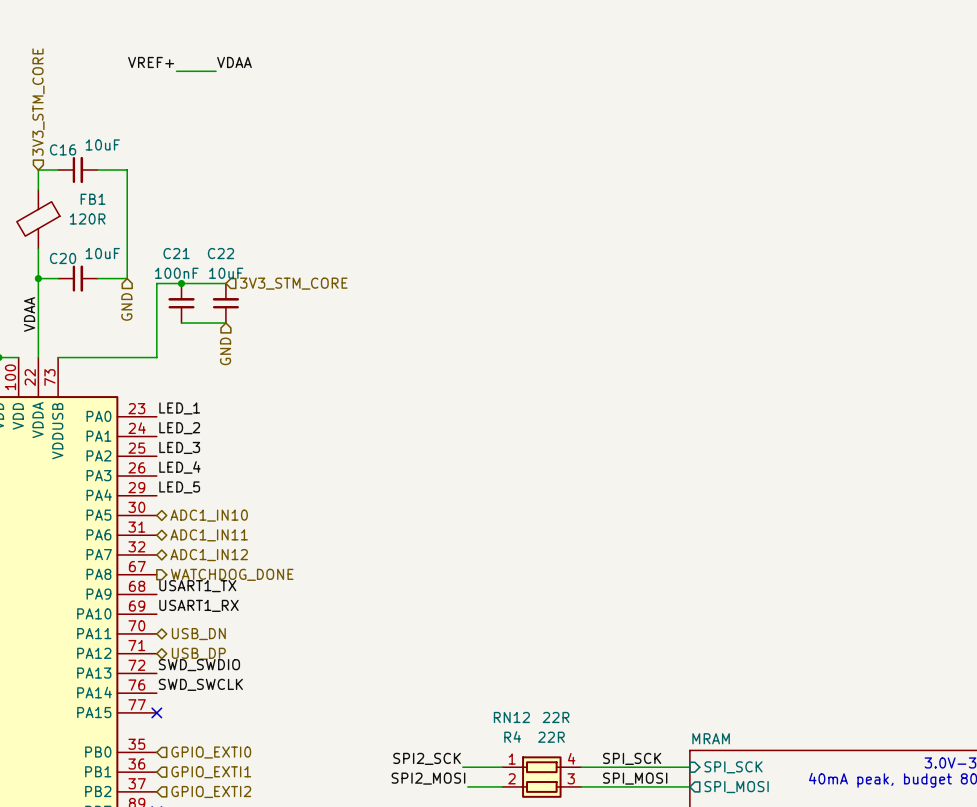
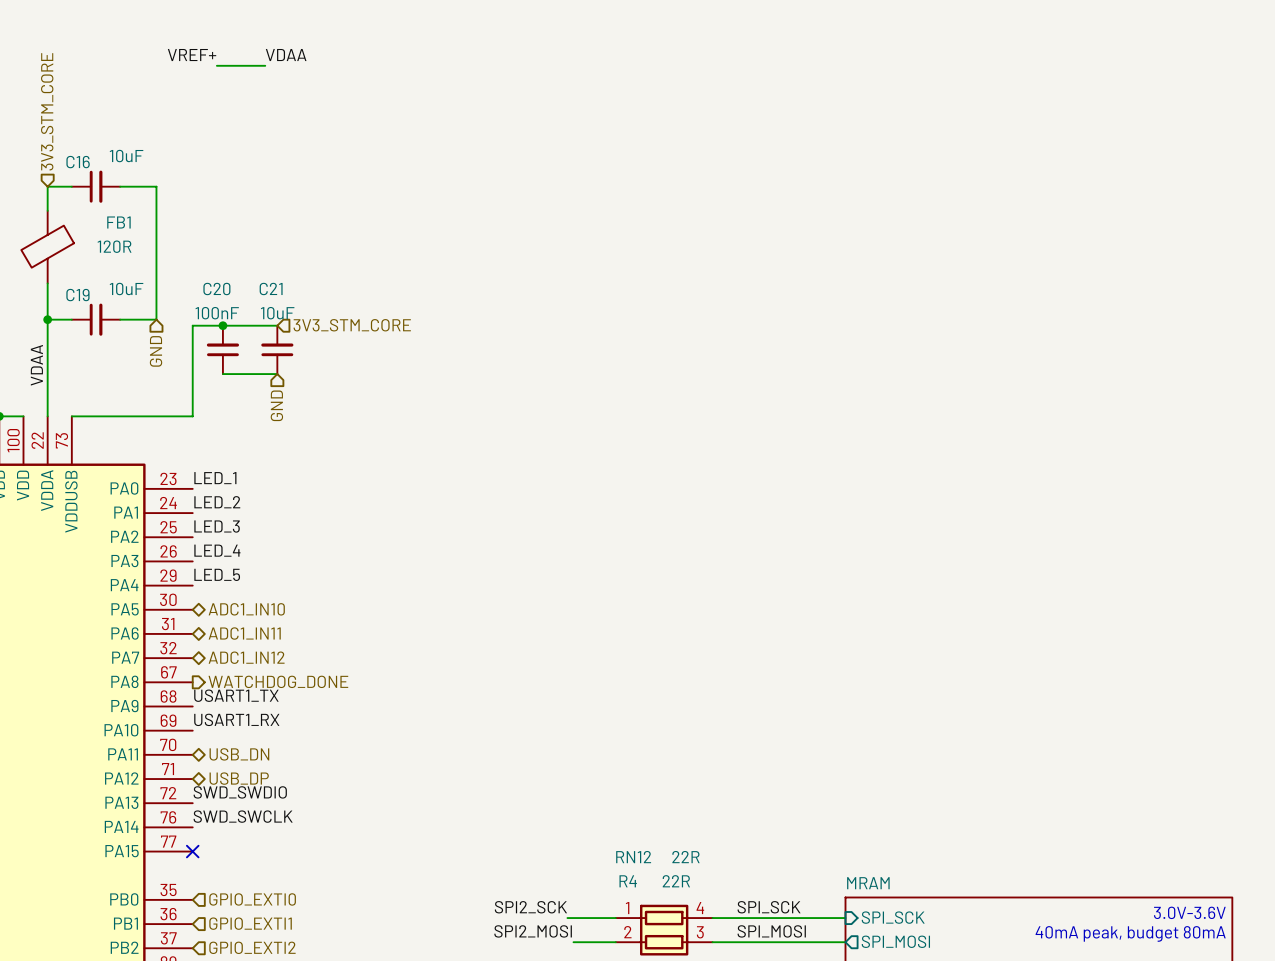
C21 name: C21 (176, 253) -> C20 (216, 289)
C22 name: C22 (220, 253) -> C21 (271, 289)
C20 name: C20 (63, 258) -> C19 (77, 295)

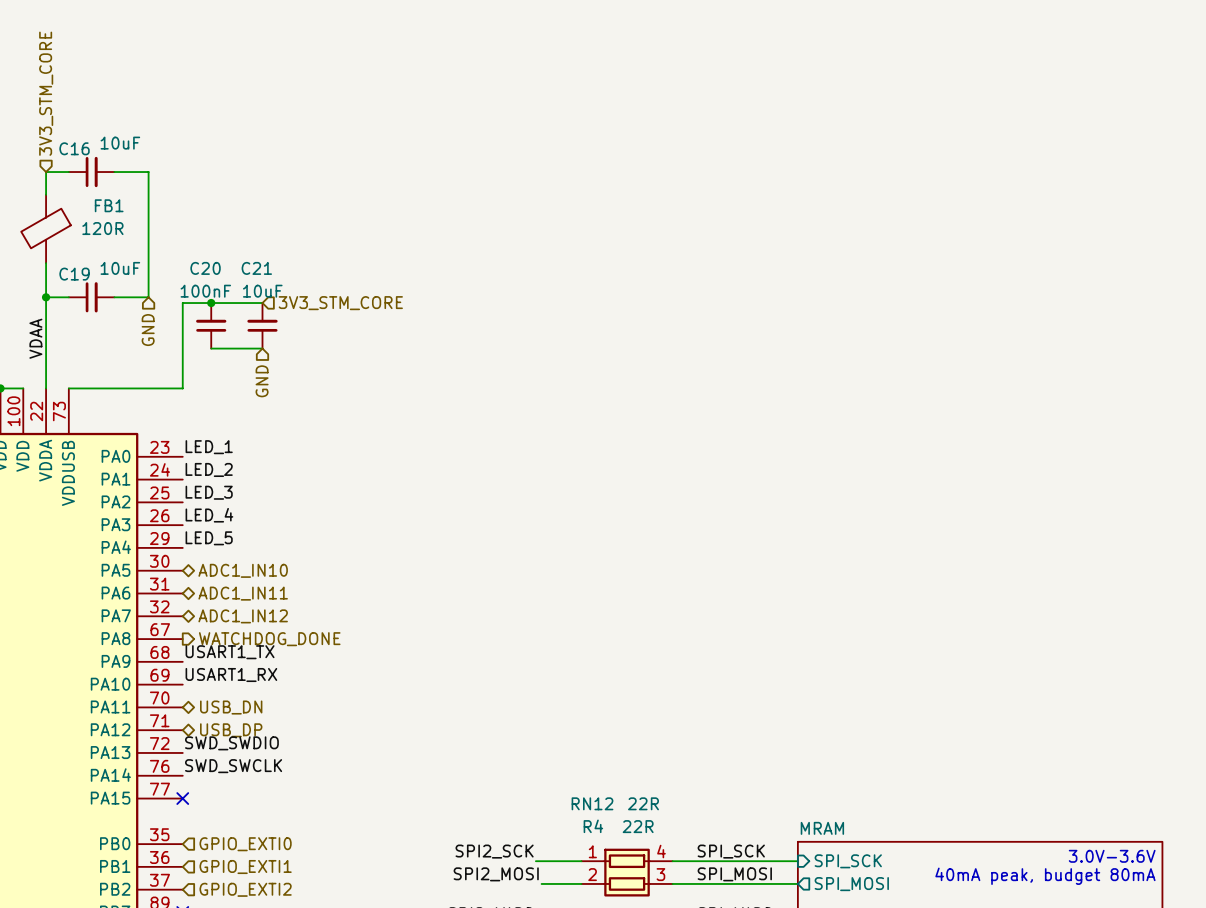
label: VREF+ (192, 55) -> none
label: VDAA (286, 55) -> none
wire: (216, 65) (265, 65) -> none

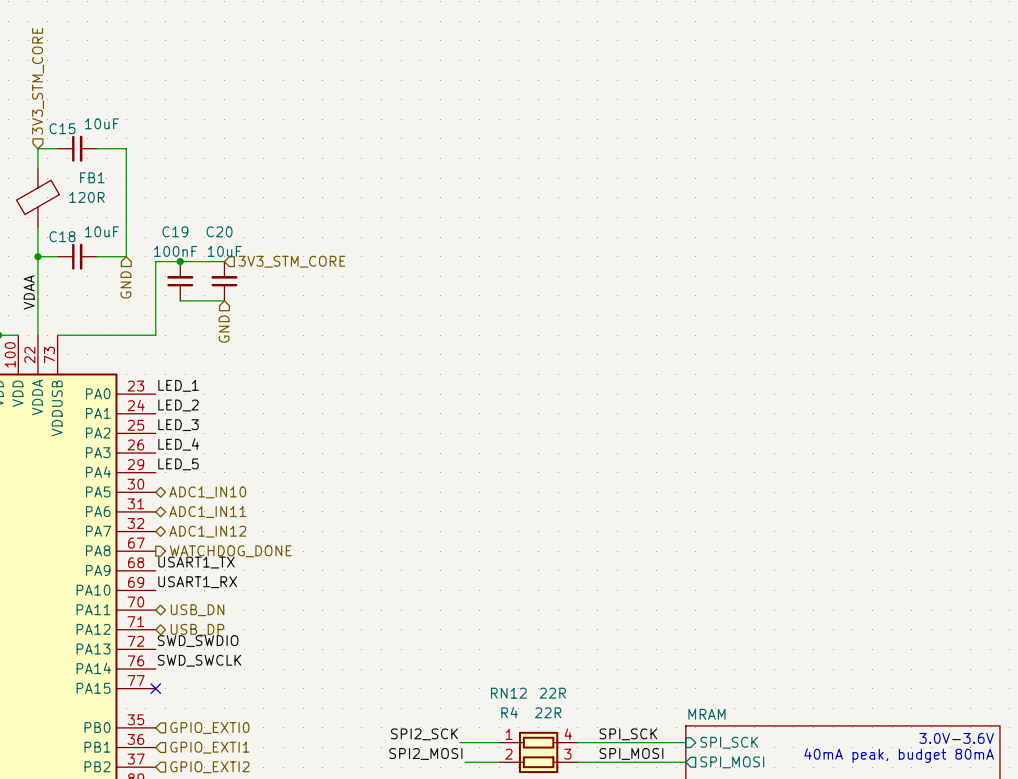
C16 name: C16 (74, 148) -> C15 (62, 128)
C20 name: C20 (205, 268) -> C19 (175, 231)
C21 name: C21 (256, 268) -> C20 (219, 231)
C19 name: C19 (74, 274) -> C18 (62, 236)

